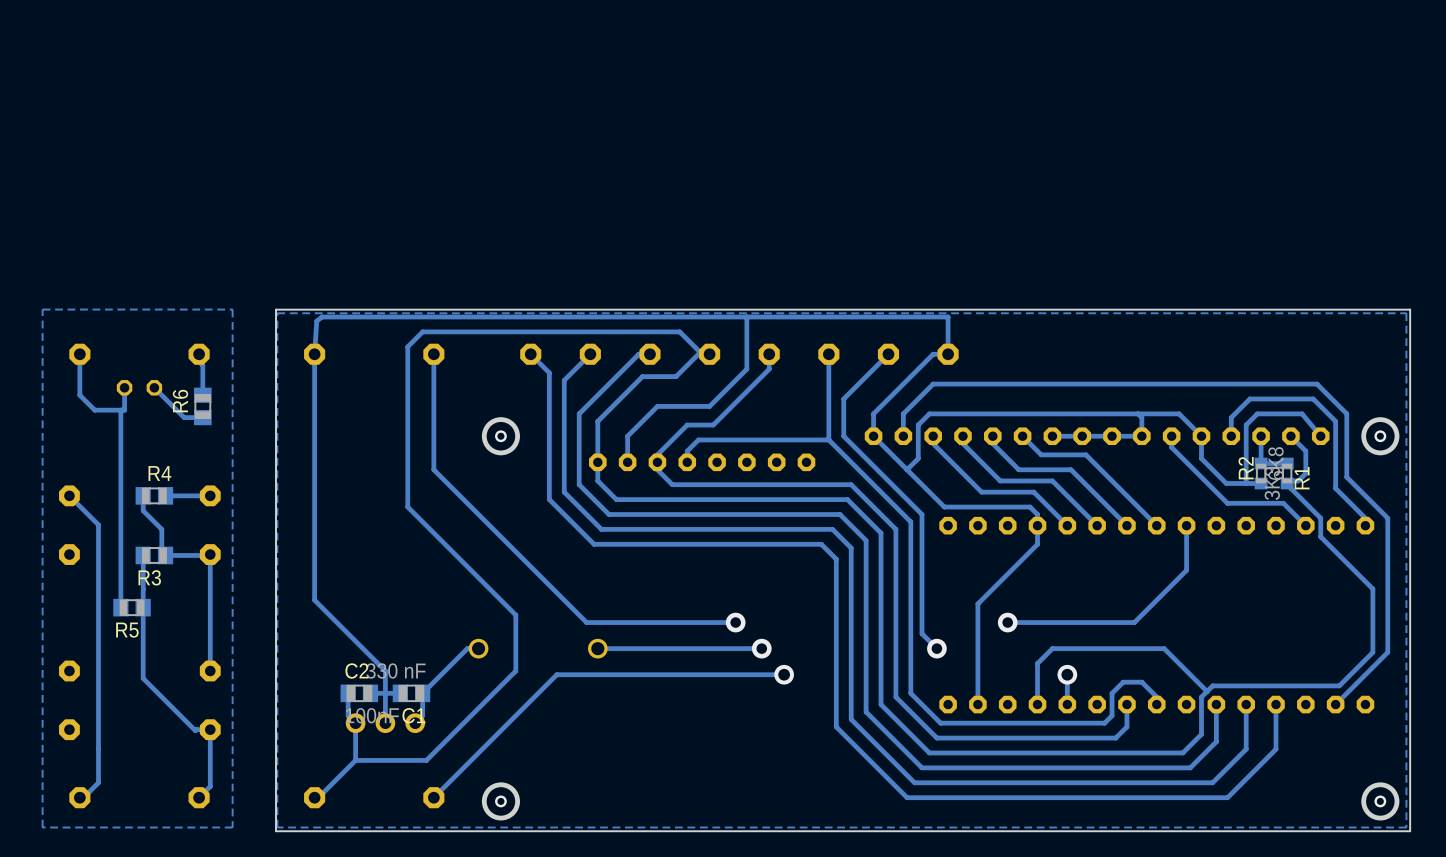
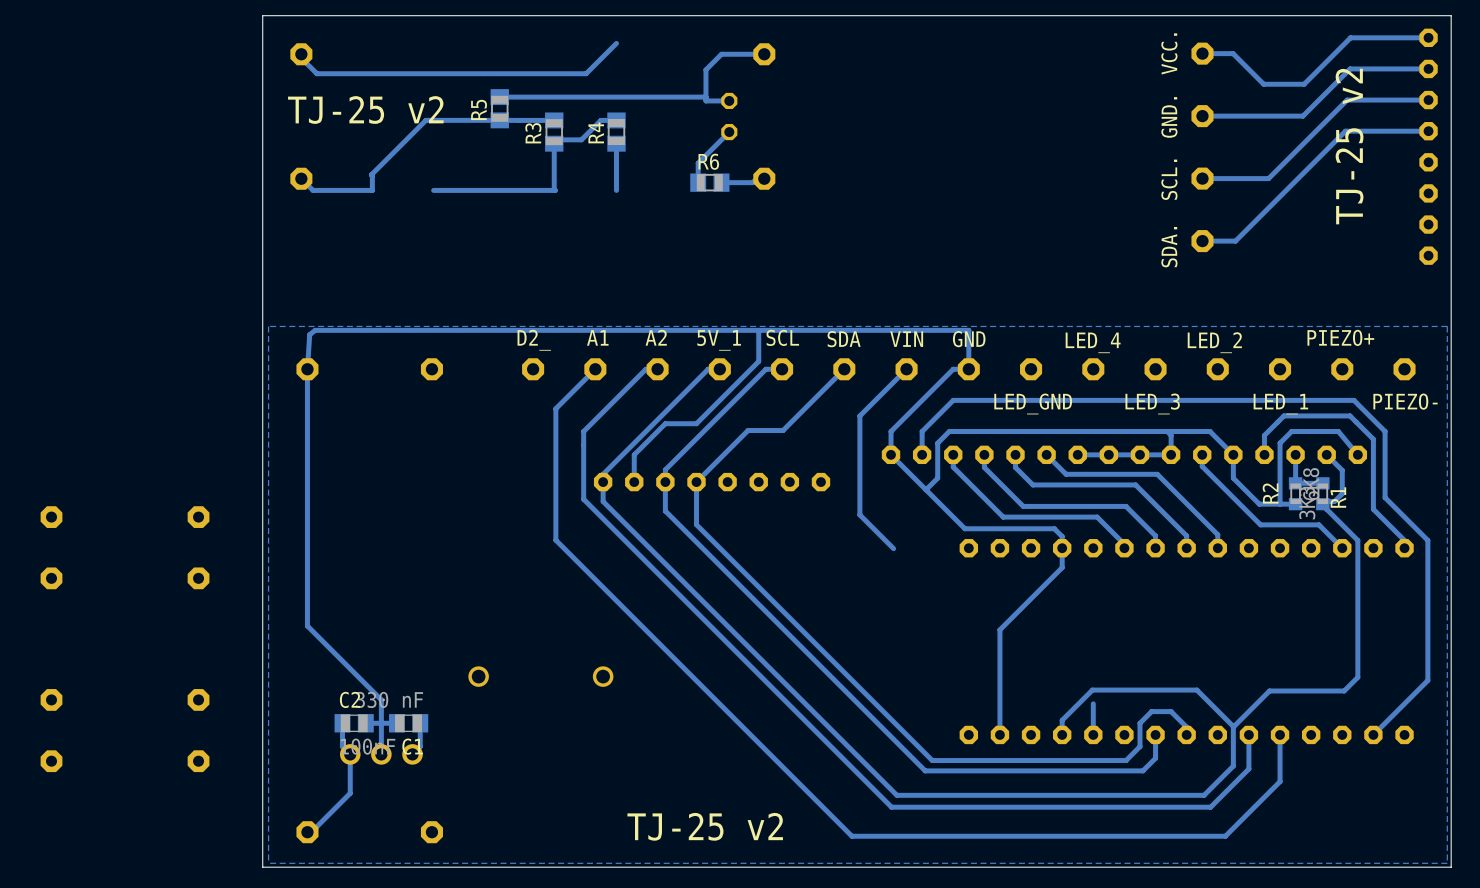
track: none -> (1428, 37) (1350, 37) (1304, 84) (1263, 84) (1233, 53) (1202, 53)
track: none -> (616, 43) (586, 73) (316, 73) (297, 54) (301, 54)
VCC.: none -> (1202, 53)
part: none -> (301, 54)
track: none -> (764, 54) (721, 54) (705, 69) (705, 100) (729, 100)
part: none -> (764, 54)
track: none -> (1428, 68) (1350, 68) (1302, 116) (1202, 116)
track: none -> (705, 97) (499, 97)
track: none -> (1428, 100) (1347, 100) (1268, 178) (1202, 178)
text: none -> TJ-25 v2 (365, 110)
GND.: none -> (1202, 116)
part: none -> (729, 116)
track: none -> (554, 120) (425, 120) (371, 174) (372, 190) (313, 190) (301, 178)
track: none -> (616, 120) (600, 120) (581, 139) (554, 139) (555, 190) (433, 190)
track: none -> (1428, 131) (1345, 131) (1235, 241) (1202, 241)
track: none -> (729, 132) (698, 163) (698, 182)
track: none -> (616, 143) (616, 190)
text: none -> TJ-25 v2 (1349, 146)
part: none -> (1428, 146)
part: none -> (301, 178)
track: none -> (764, 178) (760, 174) (752, 182) (721, 182)
part: none -> (764, 178)
SCL.: none -> (1202, 178)
SDA.: none -> (1202, 241)
zone outline: (232, 309) (232, 827) (42, 827) (42, 309) (232, 309) -> none
board edge: (1410, 309) (276, 309) (276, 831) -> (1451, 322) (1451, 15) (262, 15) (262, 867) (267, 867)
A1 name: none -> A1 (597, 337)
A2 name: none -> A2 (656, 337)
SCL name: none -> SCL (782, 337)
SDA name: none -> SDA (844, 339)
VIN name: none -> VIN (906, 339)
GND name: none -> GND (969, 339)
D2_ name: none -> D2_ (534, 340)
5V_1 name: none -> 5V_1 (719, 340)
track: (746, 346) (746, 369) (709, 406) (687, 406) -> (758, 361) (696, 423)
track: (79, 354) (79, 395) (94, 410) (124, 410) (124, 387) -> none
part: (79, 354) -> none
track: (199, 354) (195, 357) (202, 365) (202, 395) -> none
part: (199, 354) -> none
track: (433, 354) (433, 469) (586, 622) (735, 622) -> none
track: (530, 354) (549, 372) (549, 499) (594, 544) (821, 544) (836, 559) (836, 726) (907, 797) (1227, 797) (1276, 749) (1276, 704) -> none
track: (702, 354) (679, 331) (422, 331) (407, 346) (407, 507) (515, 615) (515, 671) (426, 760) (355, 760) -> none
track: (769, 354) (769, 369) (713, 425) (687, 425) (657, 454) -> (782, 369) (765, 369) (665, 469) (665, 474)
track: (828, 354) (828, 439) -> none
LED_GND: none -> (1031, 369)
LED_4: none -> (1093, 369)
LED_3: none -> (1155, 369)
LED_2: none -> (1217, 369)
LED_1: none -> (1280, 369)
PIEZO+: none -> (1342, 369)
PIEZO-: none -> (1404, 369)
track: (676, 376) (642, 376) (597, 421) (597, 454) -> (684, 392) (603, 474)
track: (564, 380) (564, 492) (601, 529) (832, 529) (851, 548) (851, 719) (914, 782) (1212, 782) -> (568, 396) (555, 408) (555, 540) (851, 836) (1225, 836) (1245, 816)
part: (139, 387) -> none
track: (154, 387) (184, 417) (202, 417) -> none
R6 rotation: 0° (202, 406) -> 90° clockwise (709, 182)
R6 position: (202, 406) -> (709, 182)
track: (120, 410) (120, 607) -> none
round board edge: [481, 417, 520, 456] -> none
round board edge: [1361, 417, 1400, 456] -> none
via: (500, 436) -> none
track: (843, 436) (922, 514) (922, 633) (936, 648) -> (859, 454) (859, 514) (893, 548)
via: (1380, 436) -> none
track: (828, 439) (910, 521) (910, 693) (940, 723) (1104, 723) -> (844, 369) (783, 430) (748, 430) (696, 482) (696, 524) (932, 760) (1126, 760) (1132, 754)
track: (828, 439) (698, 439) (687, 451) (687, 462) -> none
track: (933, 443) (981, 492) (1033, 492) (1067, 525) -> none
track: (963, 443) (1000, 480) (1052, 480) (1097, 525) -> (953, 462) (953, 467) (1003, 517) (1097, 517) (1124, 544) (1124, 548)
track: none -> (984, 462) (984, 467) (1023, 506) (1126, 506) (1155, 535) (1155, 548)
track: (992, 443) (1018, 469) (1071, 469) (1126, 525) -> (1015, 462) (1015, 467) (1032, 484) (1135, 484) (1186, 535) (1186, 548)
track: (1085, 454) (1156, 525) -> (1112, 474) (1157, 474) (1217, 534) (1217, 548)
R2 name position: R2 (1246, 468) -> R2 (1270, 493)
track: (657, 469) (672, 484) (851, 484) (895, 529) (895, 697) (936, 738) (1115, 738) -> (665, 489) (665, 511) (925, 770) (1143, 769)
R4 name position: R4 (159, 473) -> R4 (596, 132)
track: (579, 478) (579, 484) (608, 514) (840, 514) (866, 540) (866, 711) (922, 767) (1190, 767) (1216, 741) (1216, 737) -> (583, 499) (891, 807) (1210, 807) (1248, 768)
track: (69, 495) (98, 524) (98, 782) (79, 801) (79, 797) -> none
track: (143, 495) (143, 510) (161, 529) (161, 555) (210, 554) (210, 671) -> none
R4 rotation: 0° (154, 495) -> 90° clockwise (616, 132)
R4 position: (154, 495) -> (616, 132)
track: (210, 495) (165, 495) -> none
track: (616, 499) (847, 499) (881, 533) (881, 704) (929, 752) (1182, 752) -> (622, 520) (896, 795) (1204, 795) (1213, 785)
track: (1186, 525) (1186, 570) (1134, 622) (1007, 622) -> none
track: (1320, 536) (1372, 589) (1372, 652) (1339, 685) (1212, 685) -> (1357, 559) (1357, 677) (1344, 690) (1269, 690) (1245, 715)
track: (143, 555) (143, 678) (195, 730) (210, 729) (210, 786) (199, 797) -> none
R3 rotation: 0° (154, 555) -> 90° clockwise (554, 132)
R3 position: (154, 555) -> (554, 132)
R5 rotation: 0° (132, 607) -> 90° clockwise (499, 108)
R5 position: (132, 607) -> (499, 108)
via: (735, 622) -> none
via: (1007, 622) -> none
track: (478, 648) (467, 648) (422, 693) -> none
track: (761, 648) (597, 648) -> none
via: (761, 648) -> none
via: (936, 648) -> none
track: (784, 674) (556, 674) (433, 797) -> none
via: (784, 674) -> none
via: (1067, 674) -> none
track: (1037, 690) (1037, 663) (1052, 648) (1164, 648) (1207, 691) -> (1062, 720) (1092, 690) (1196, 690) (1233, 726)
round board edge: [481, 782, 520, 821] -> none
round board edge: [1361, 782, 1400, 821] -> none
text: none -> TJ-25 v2 (705, 826)
part: (79, 797) -> none
part: (199, 797) -> none
via: (500, 801) -> none
via: (1380, 801) -> none

